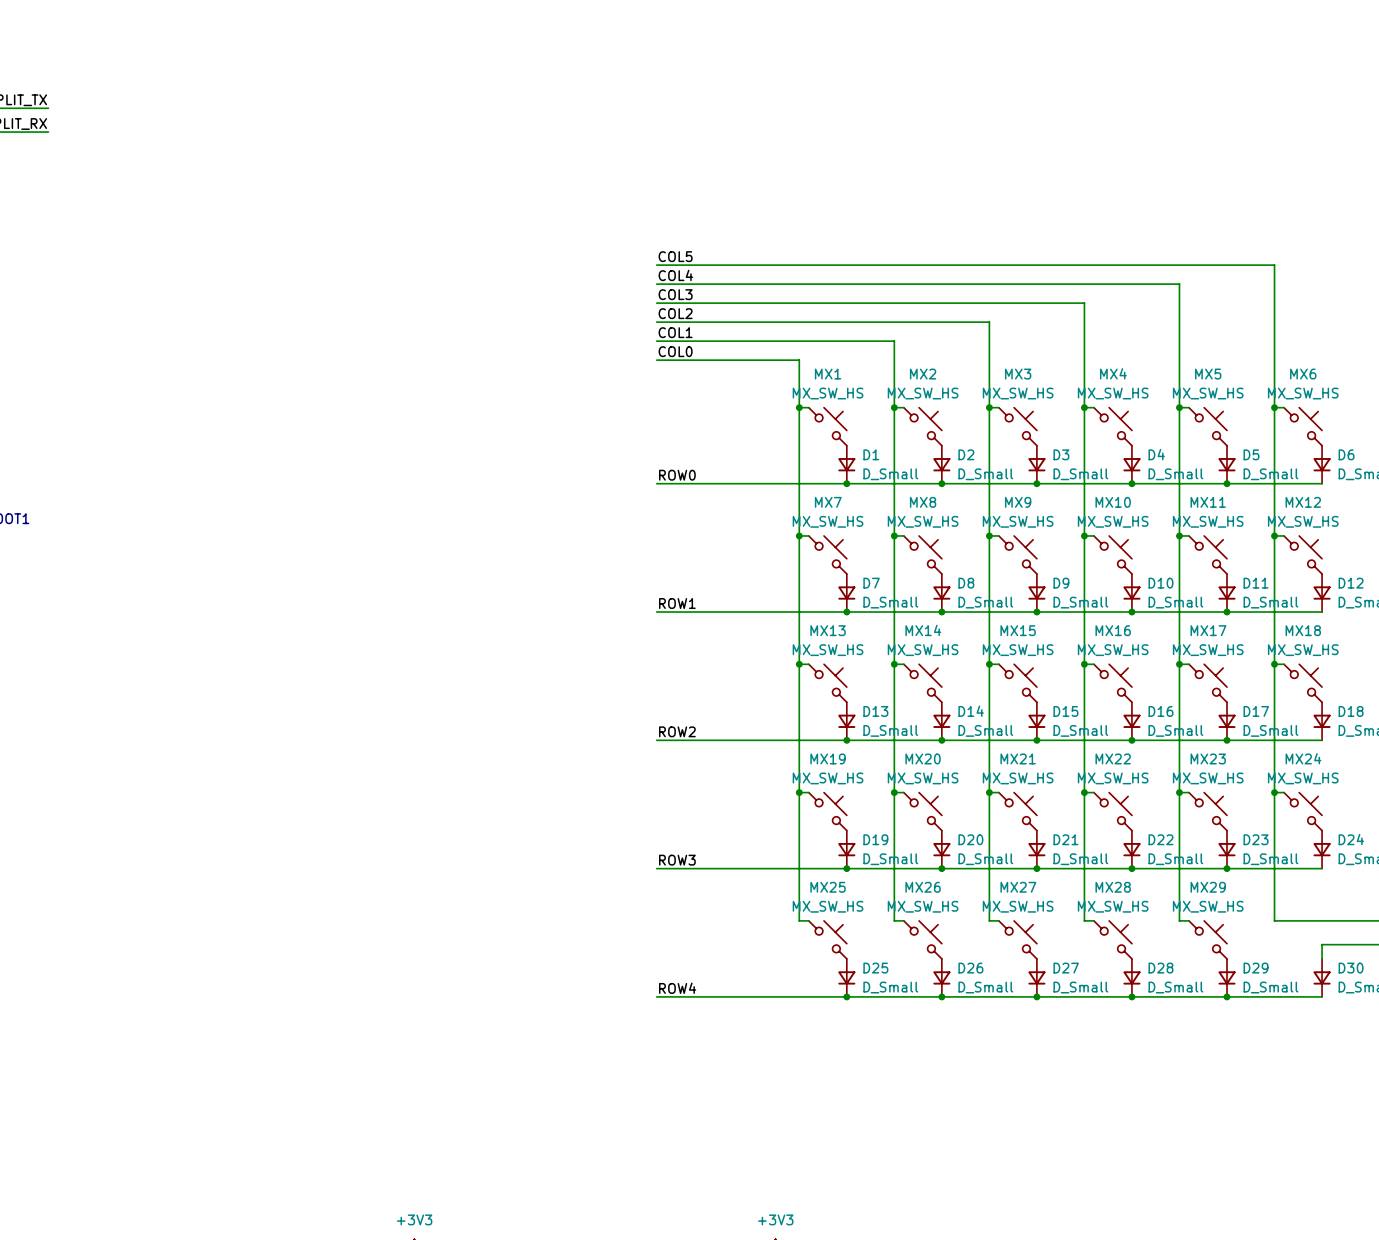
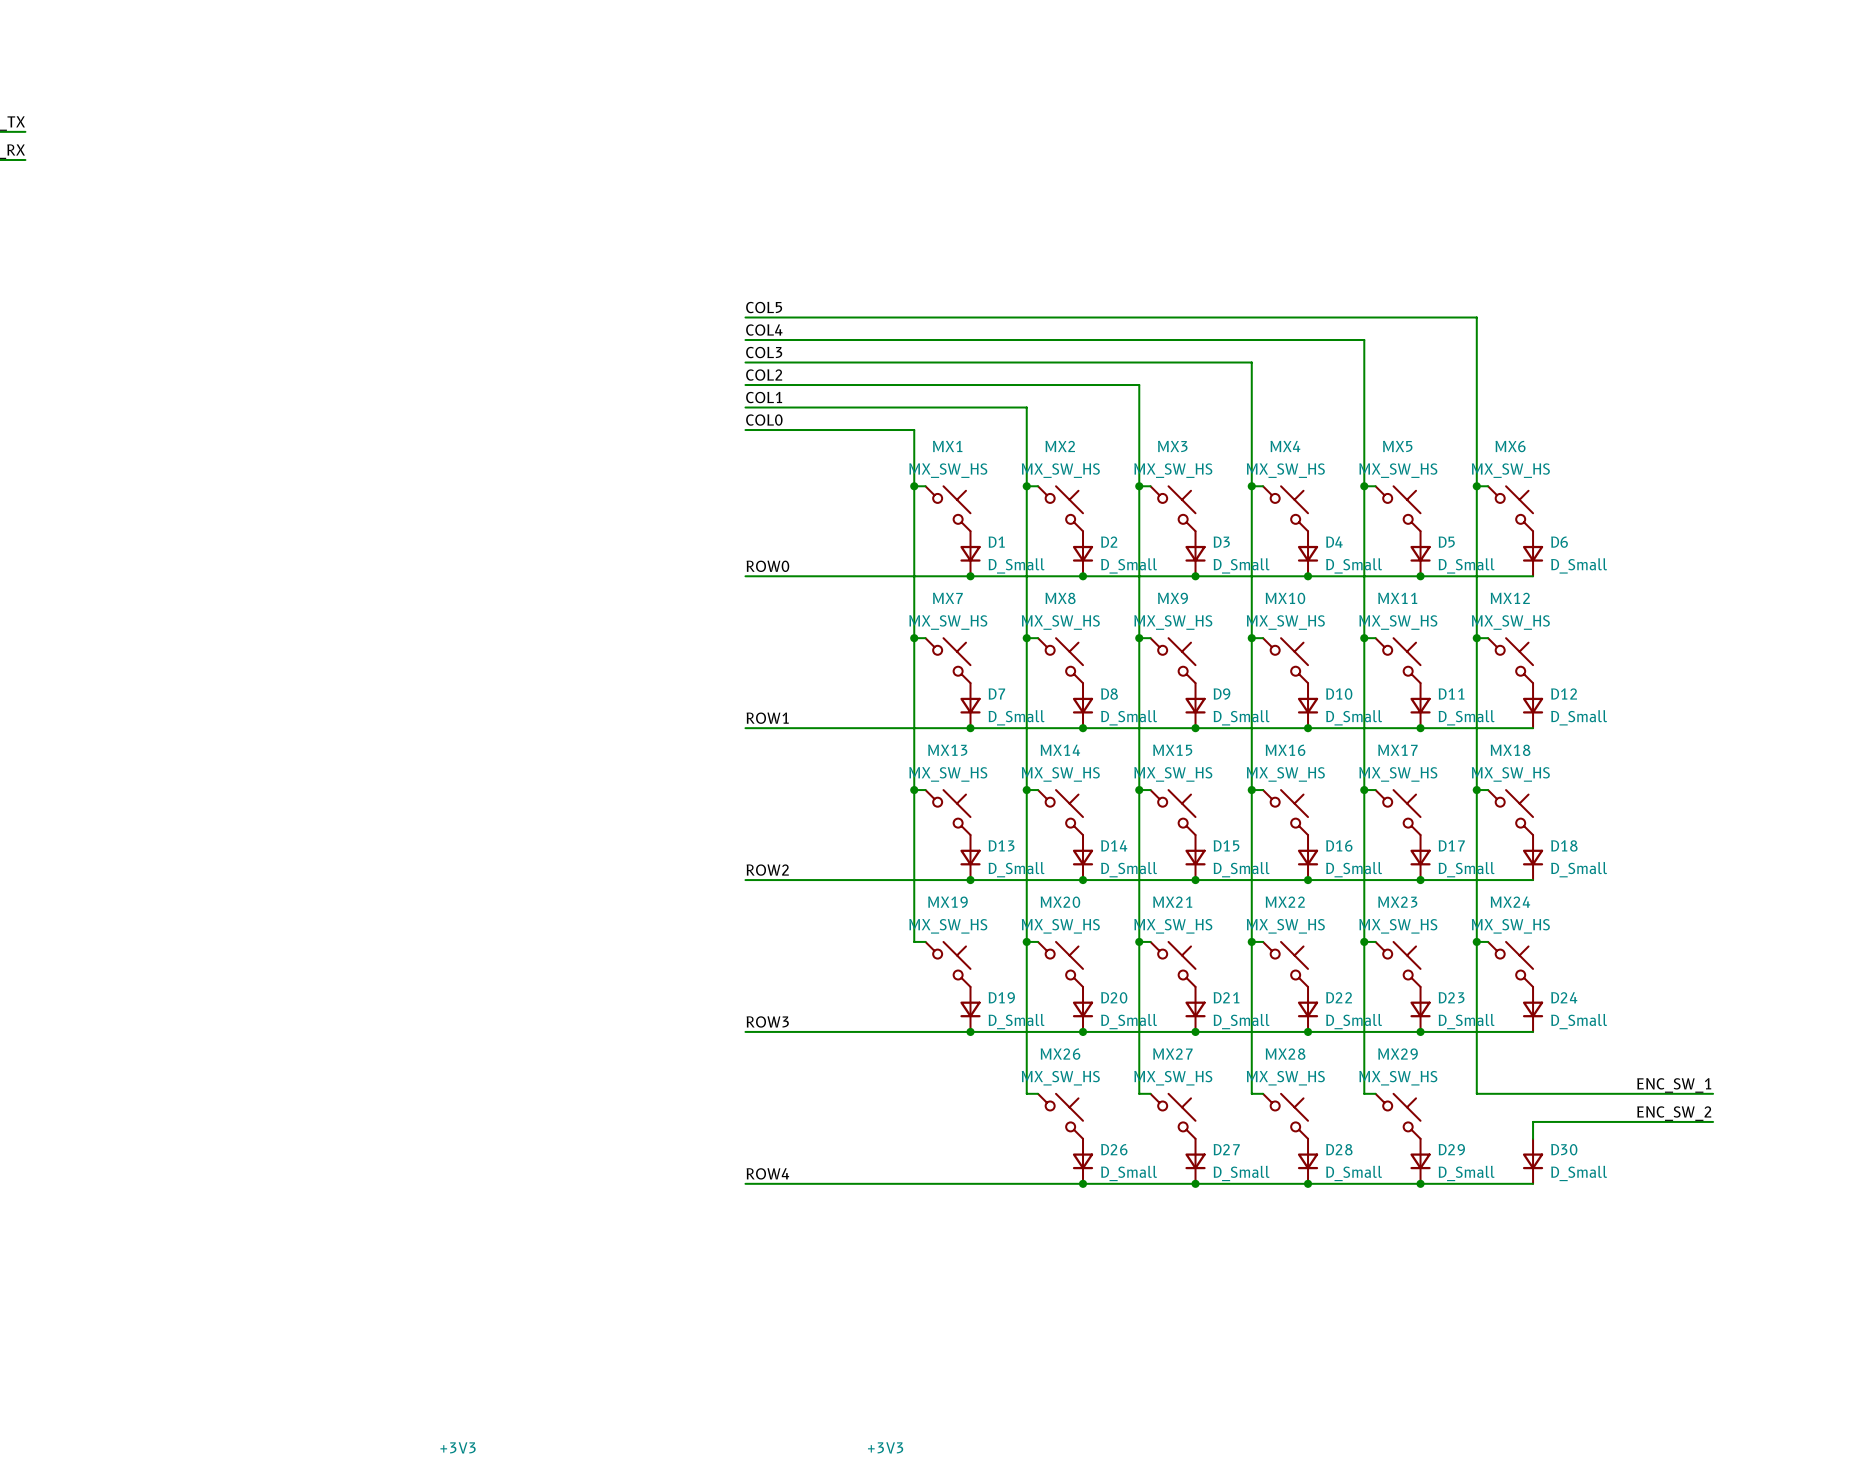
wire: (799, 792) (799, 920) (808, 920) -> none
junction: (799, 792) -> none
MX25: MX_SW_HS (827, 939) -> none
D25: D_Small (846, 977) -> none
junction: (846, 996) -> none

